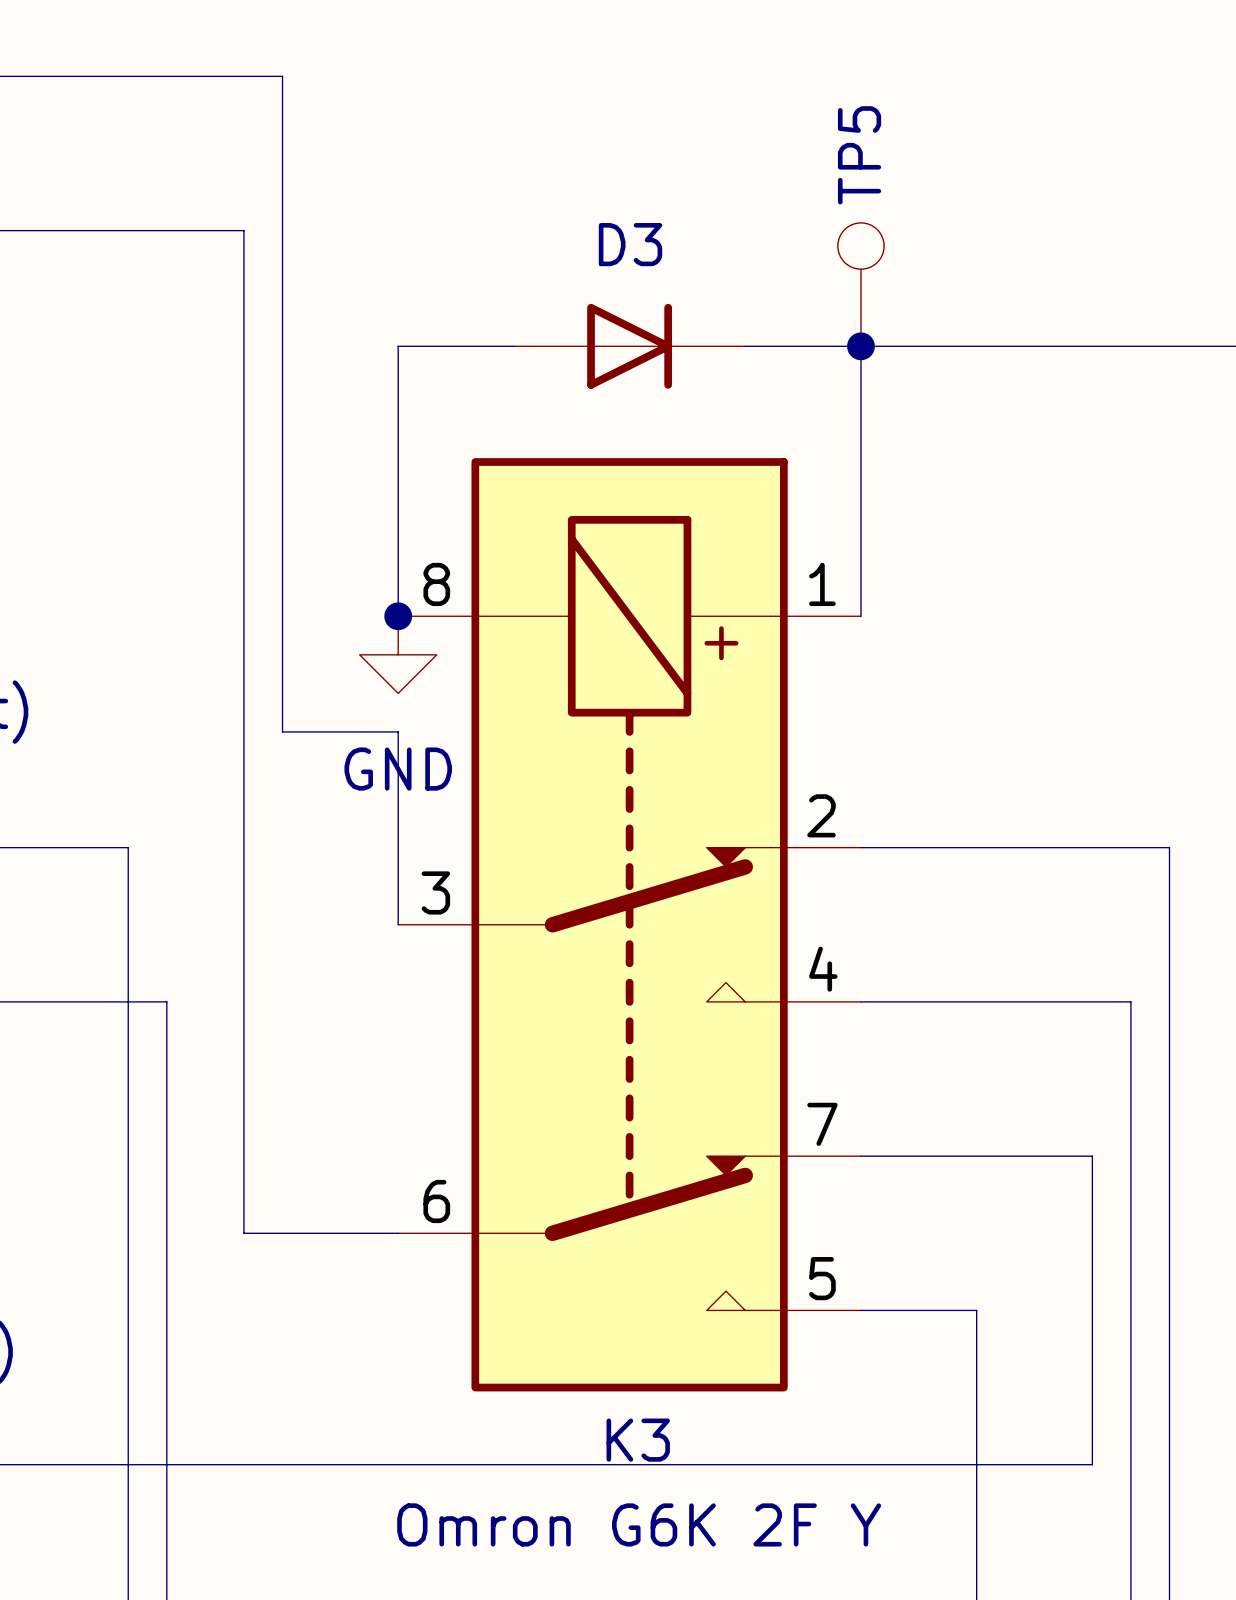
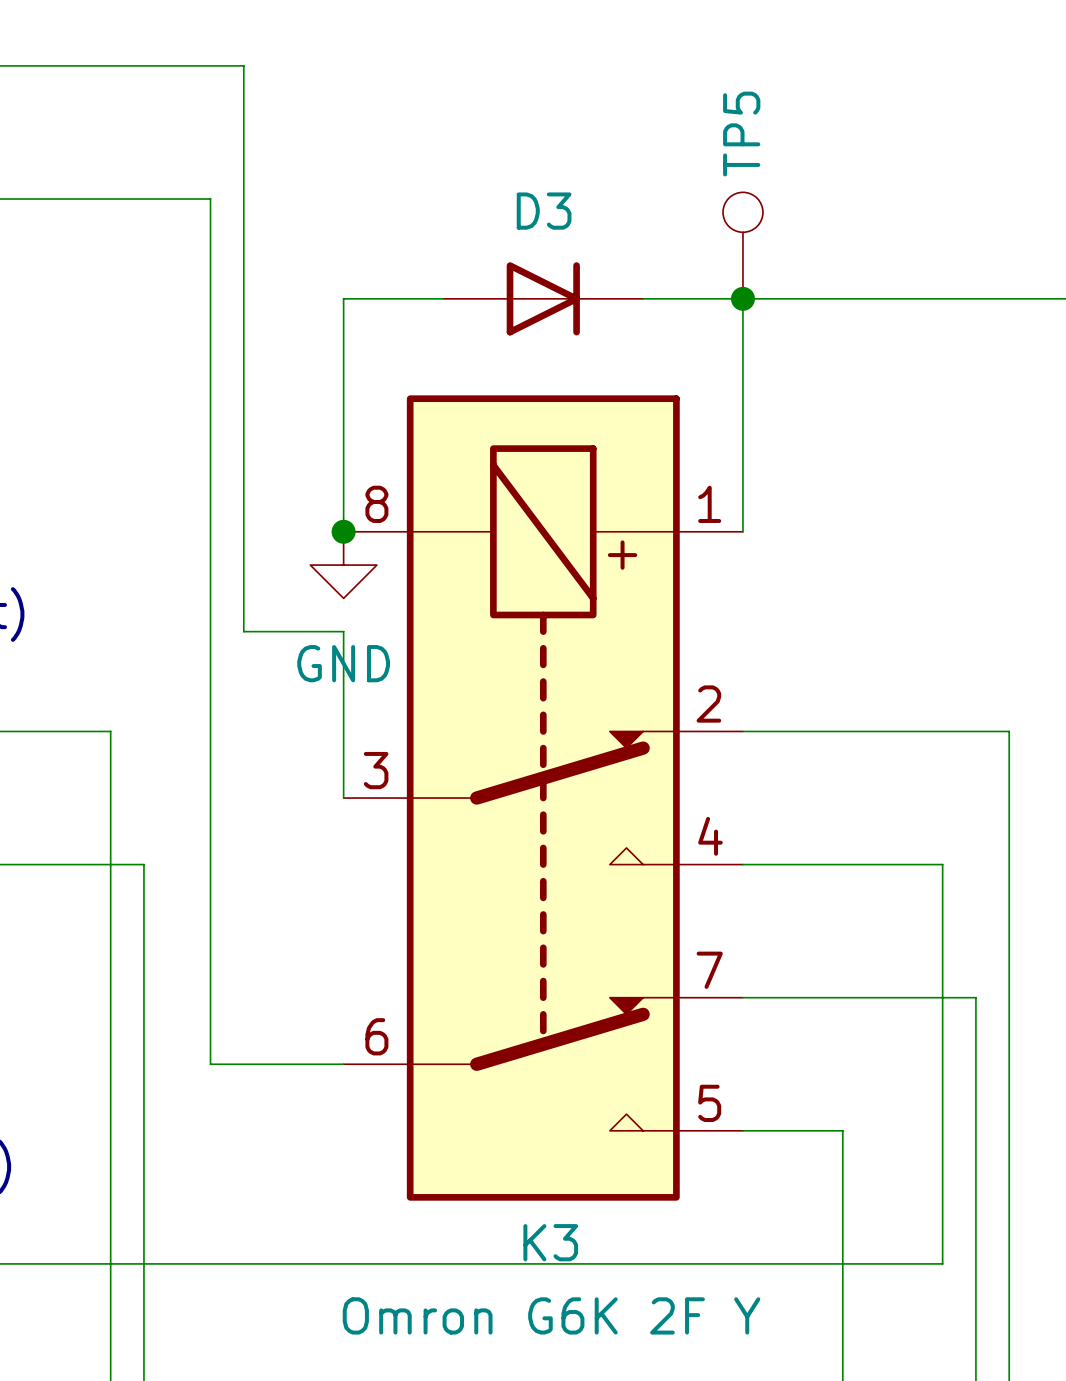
wire: (1092, 1001) (1130, 1001) (1130, 1156) -> (942, 864) (942, 997) (975, 997)

